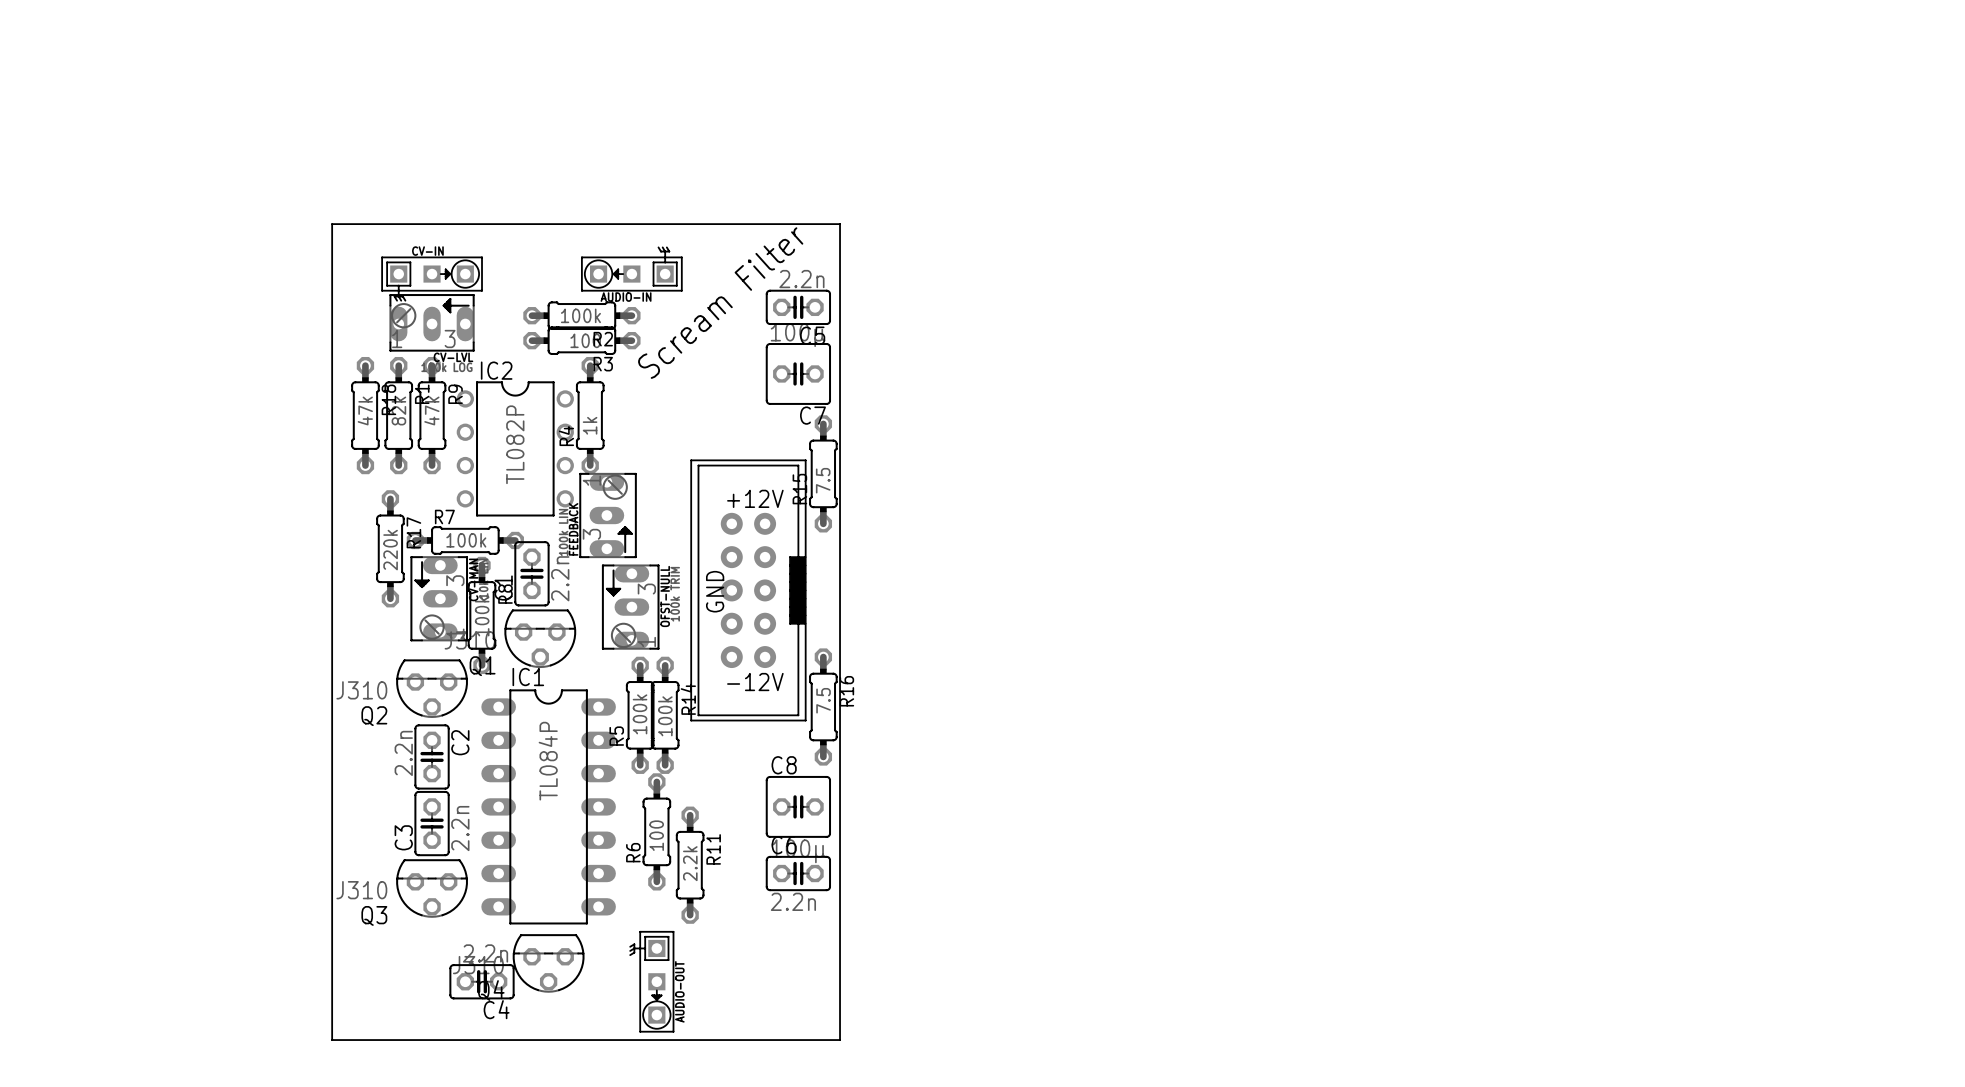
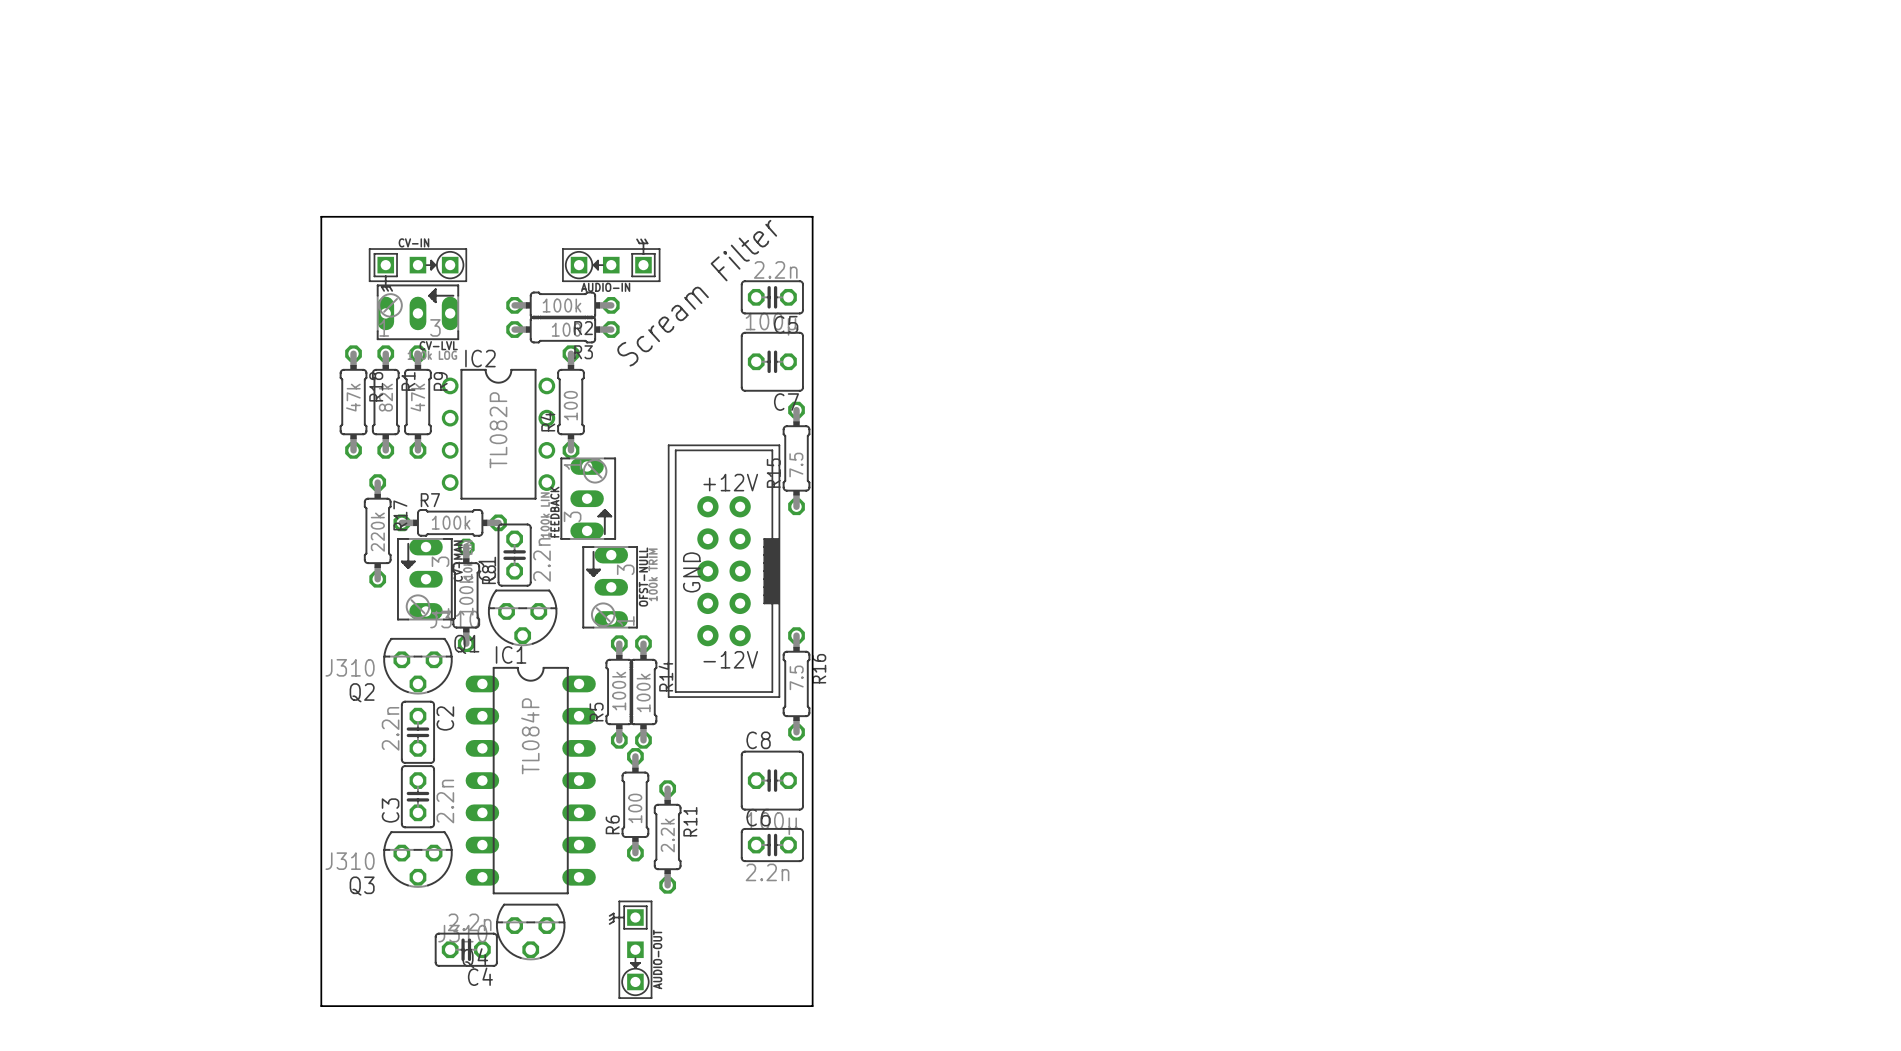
R4 value: 1k (590, 425) -> 100 (570, 405)

